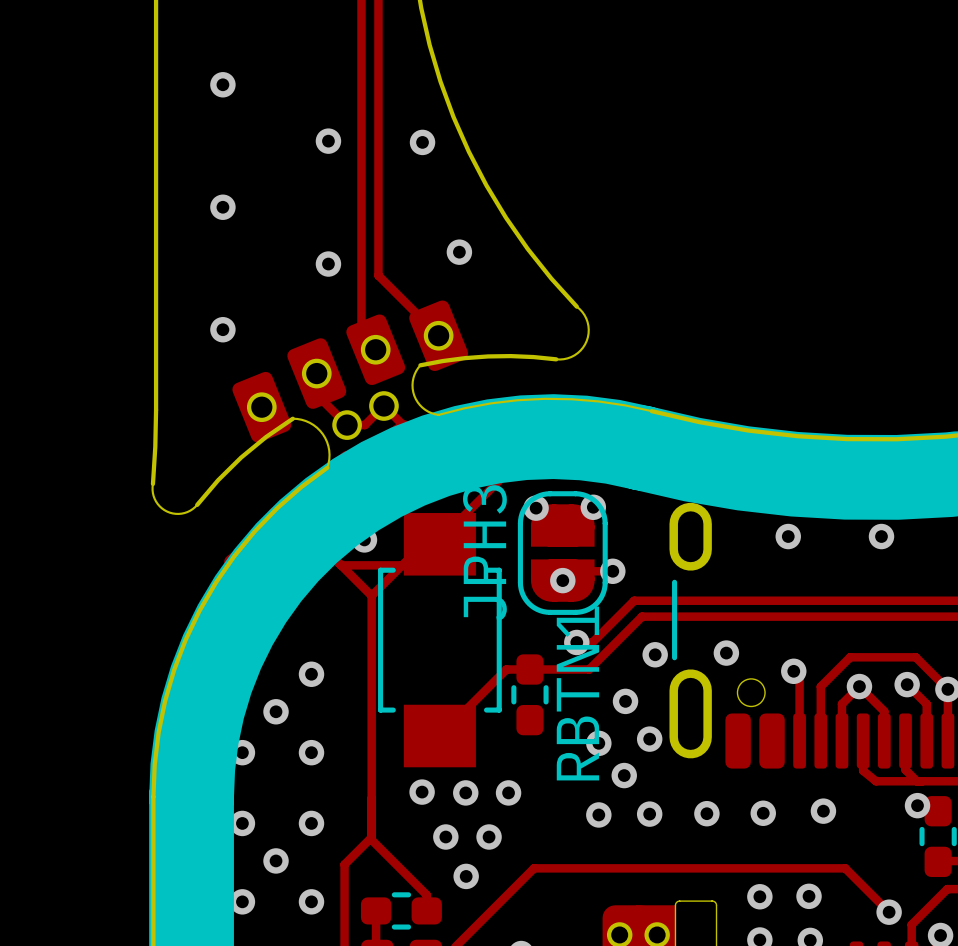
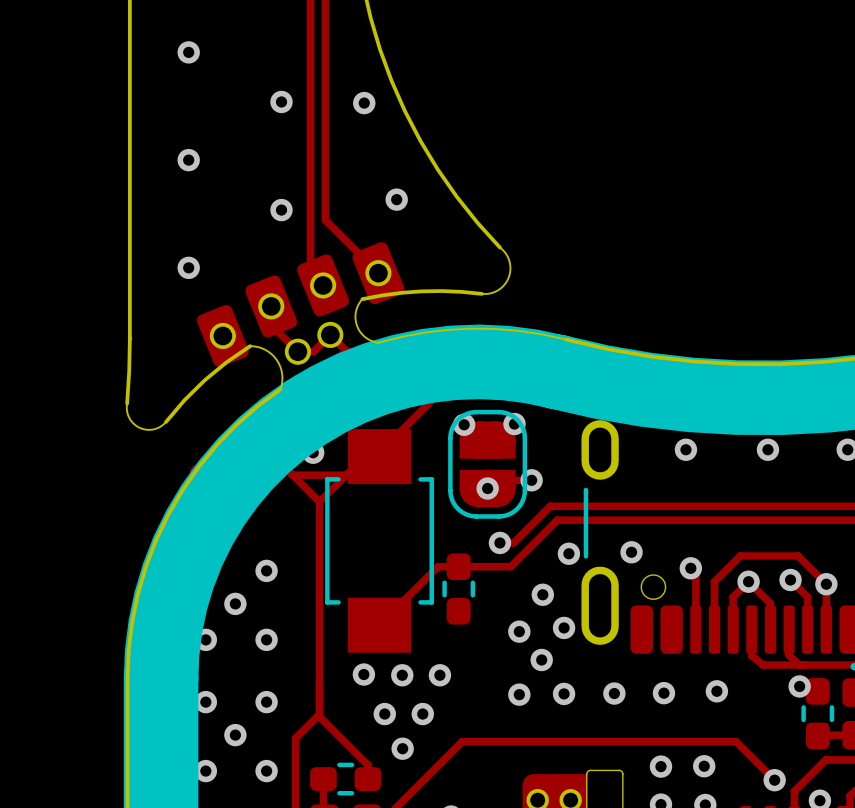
JPH3 name: JPH3 (484, 553) -> none
RBTN1 name: RBTN1 (577, 693) -> none

